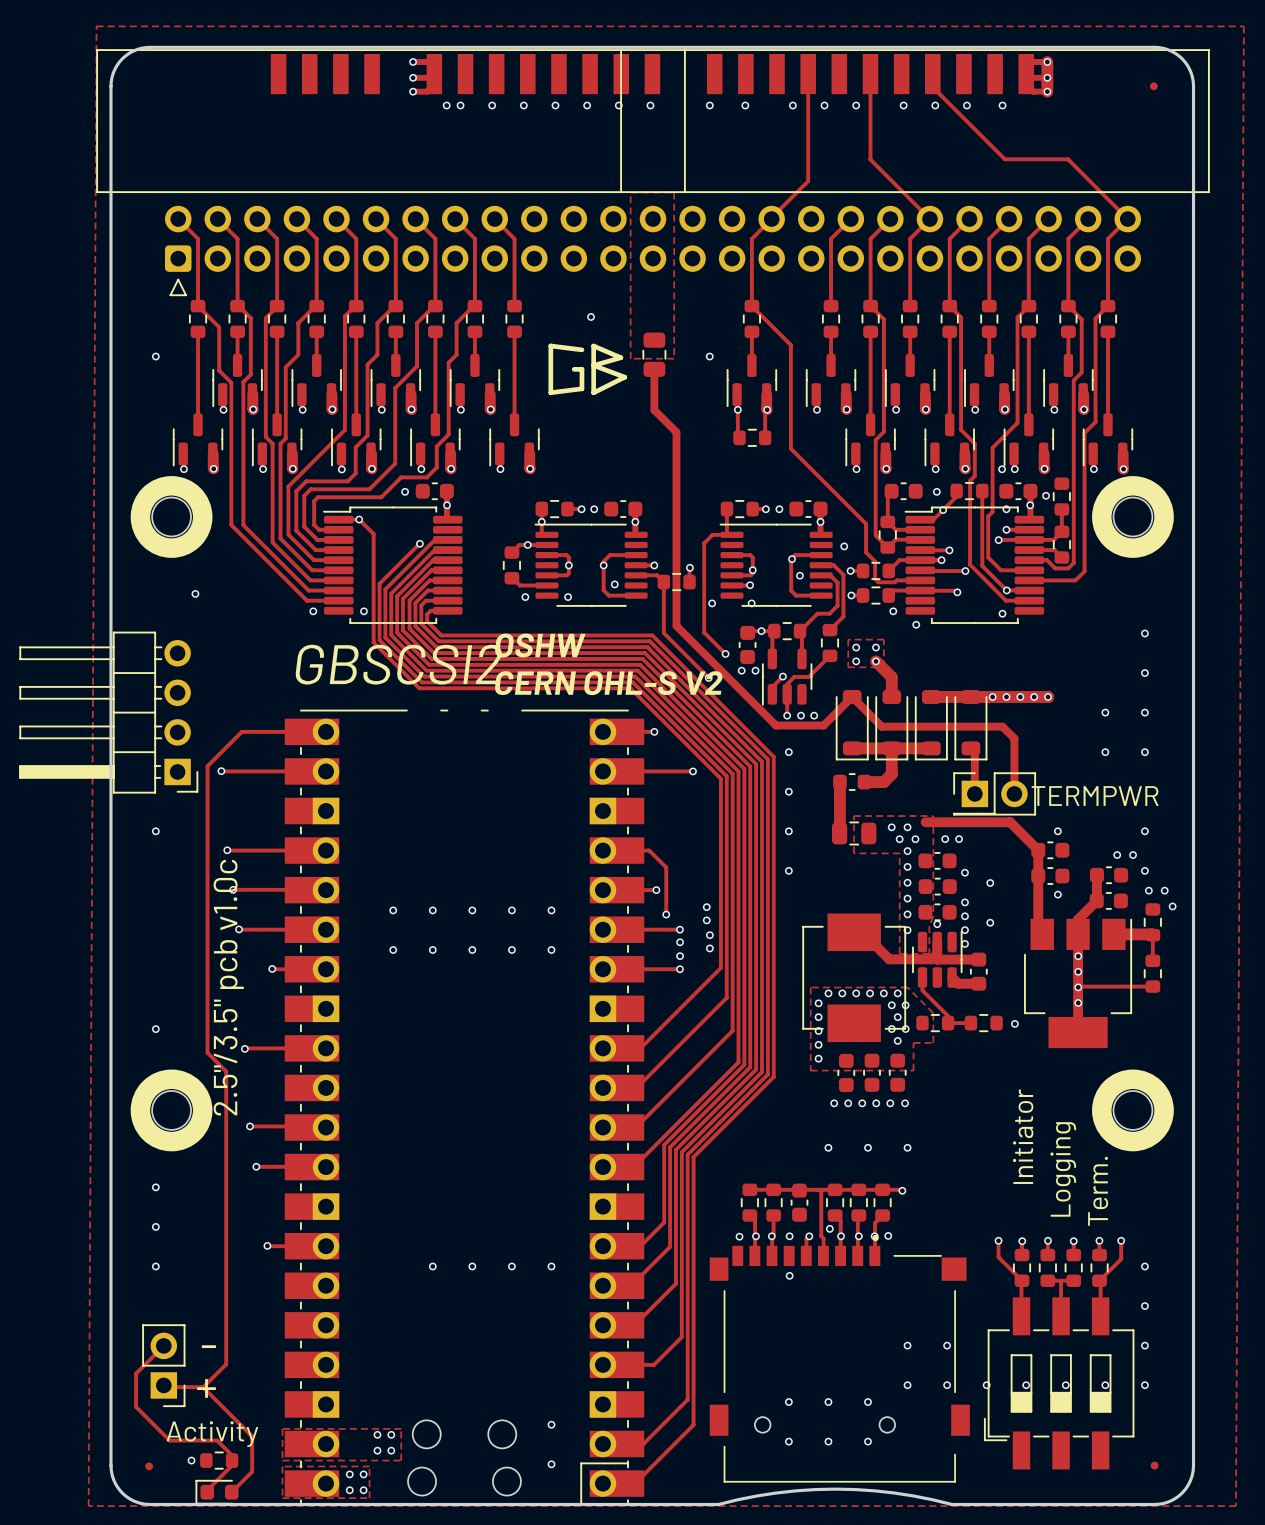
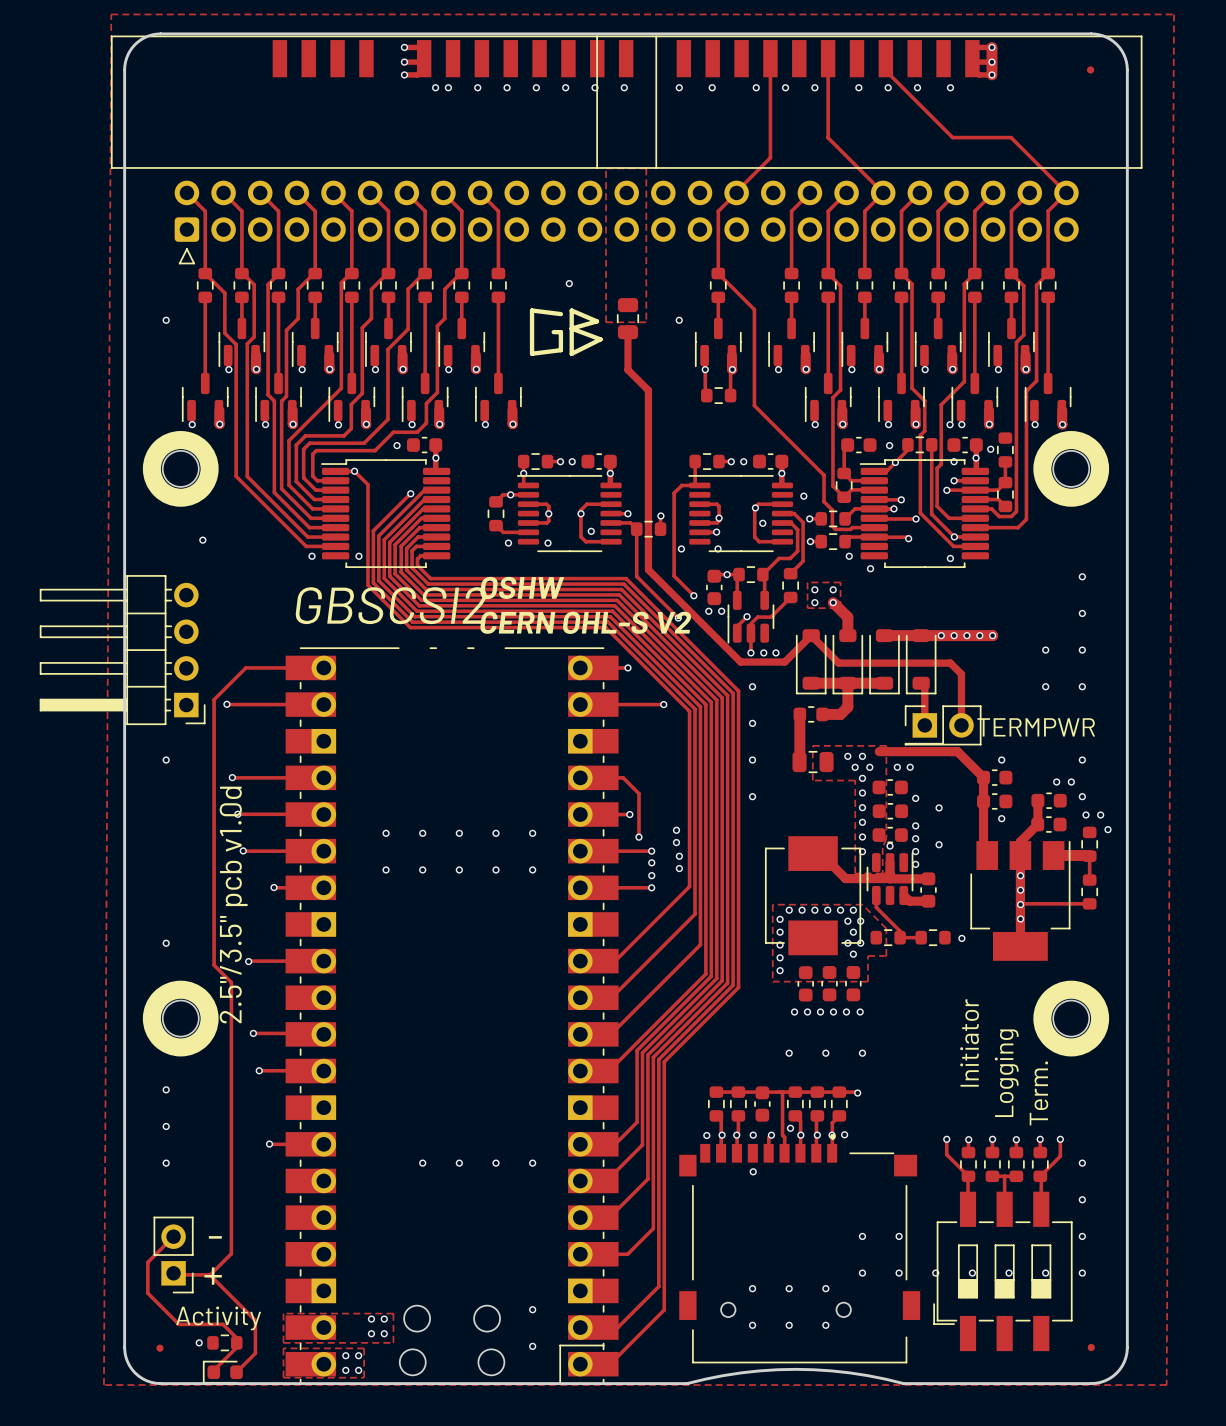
text: 2.5"/3.5" pcb v1.0c (228, 987) -> 2.5"/3.5" pcb v1.0d (233, 904)

